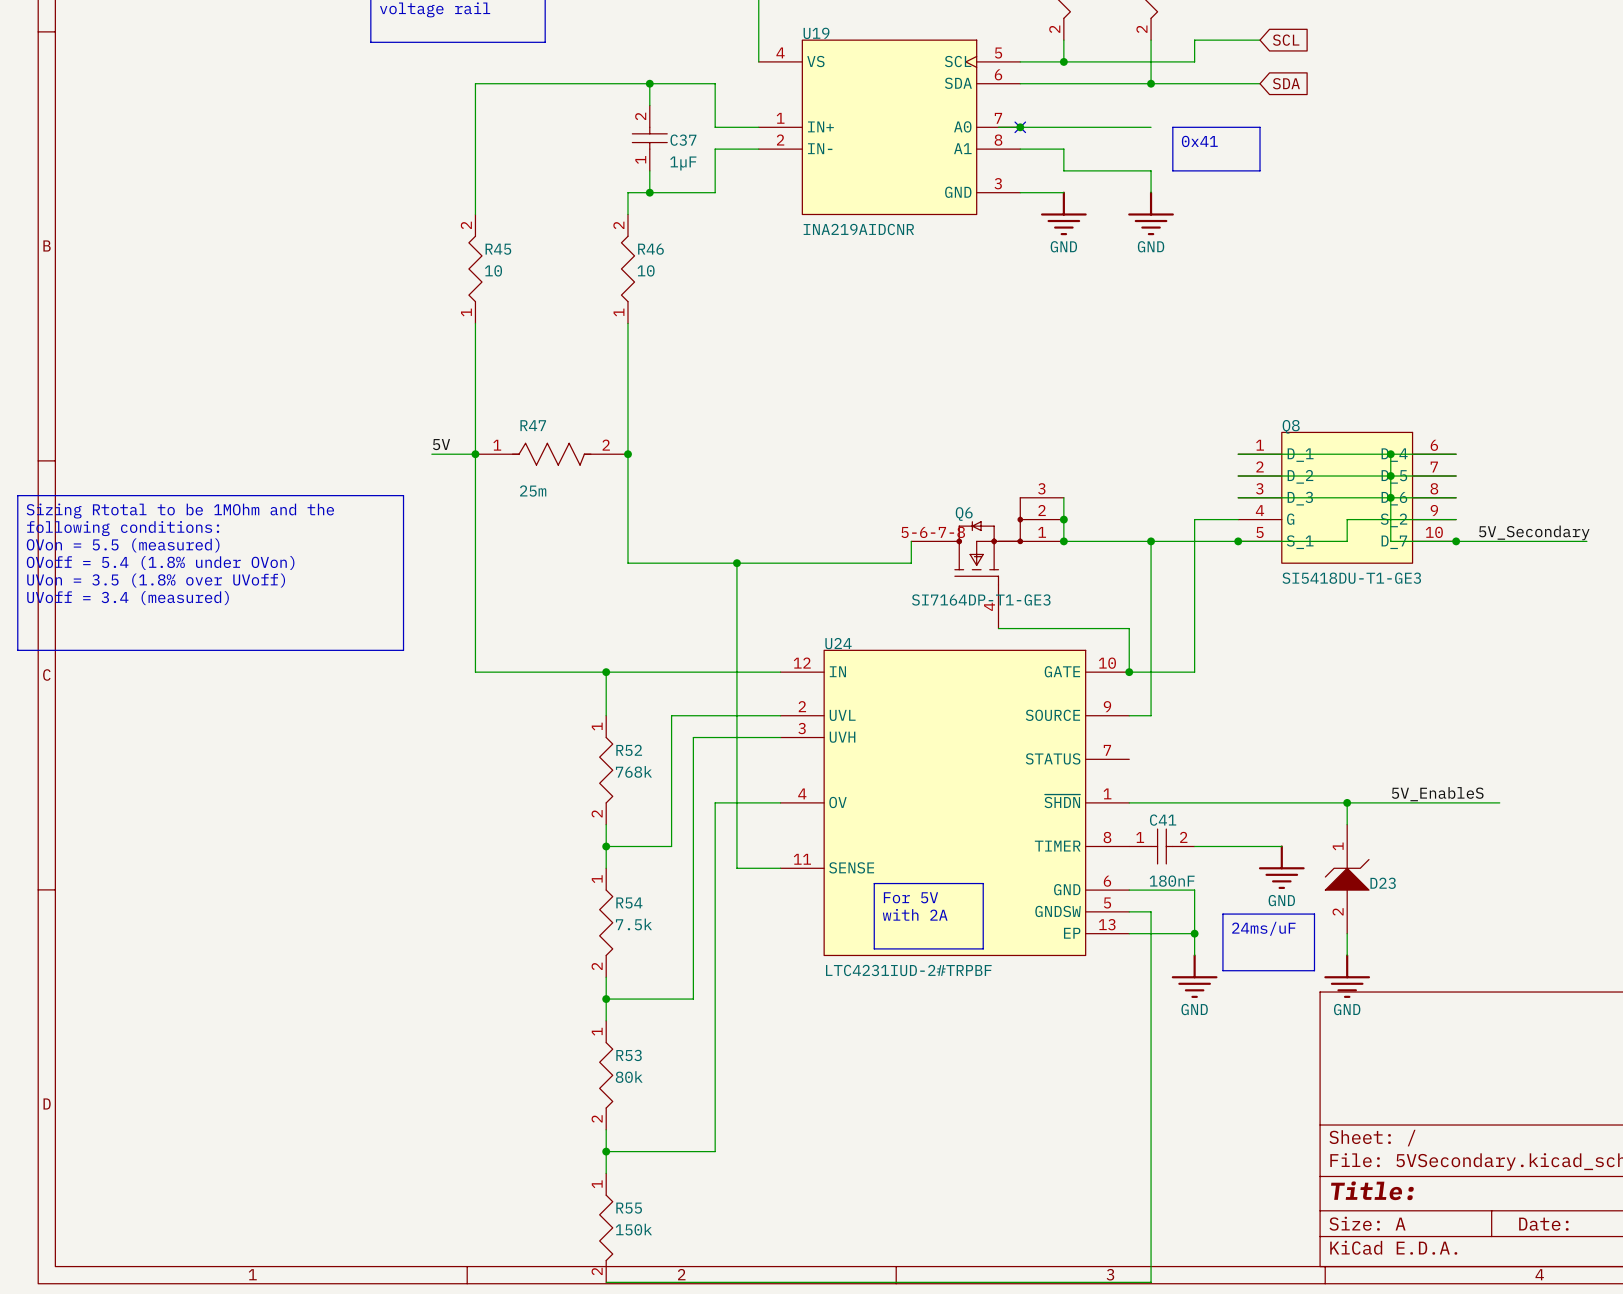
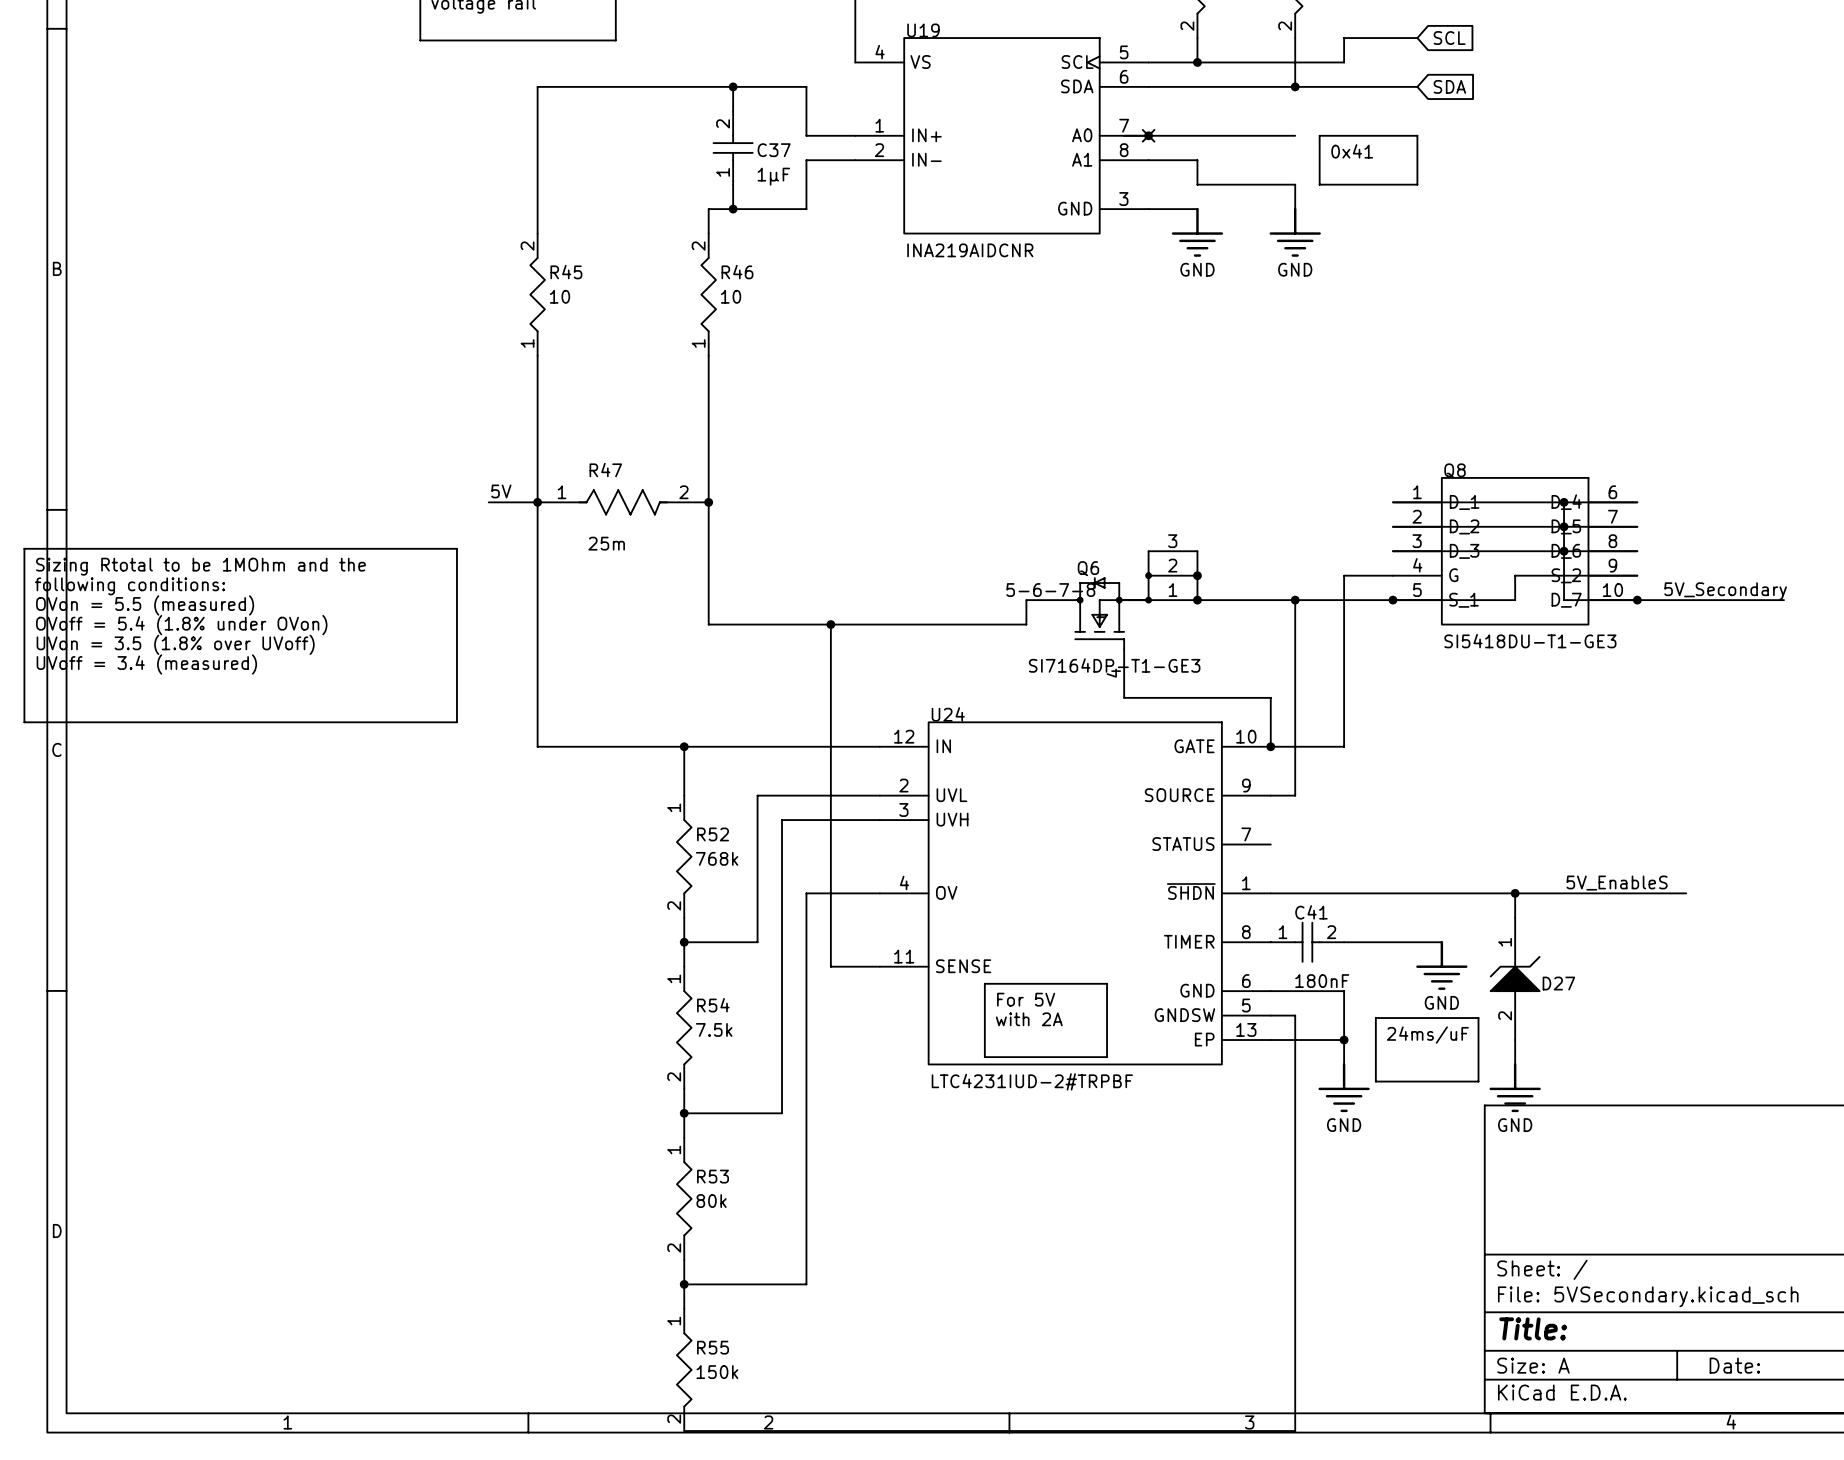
D23 name: D23 (1383, 883) -> D27 (1558, 983)

